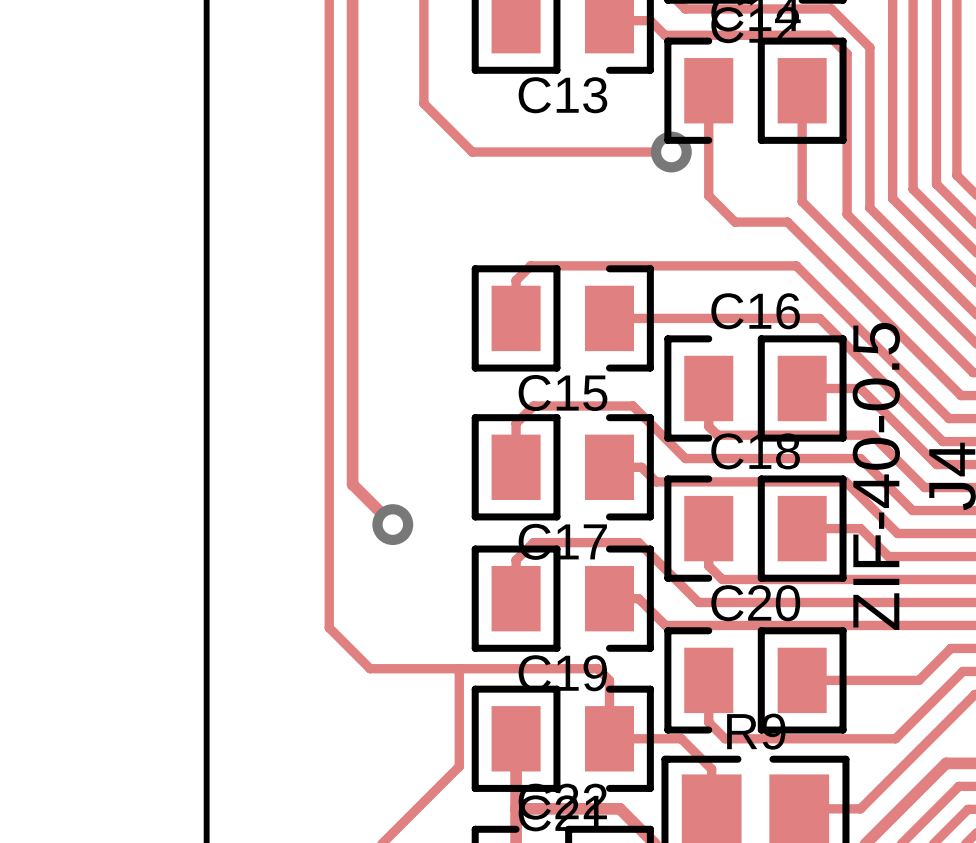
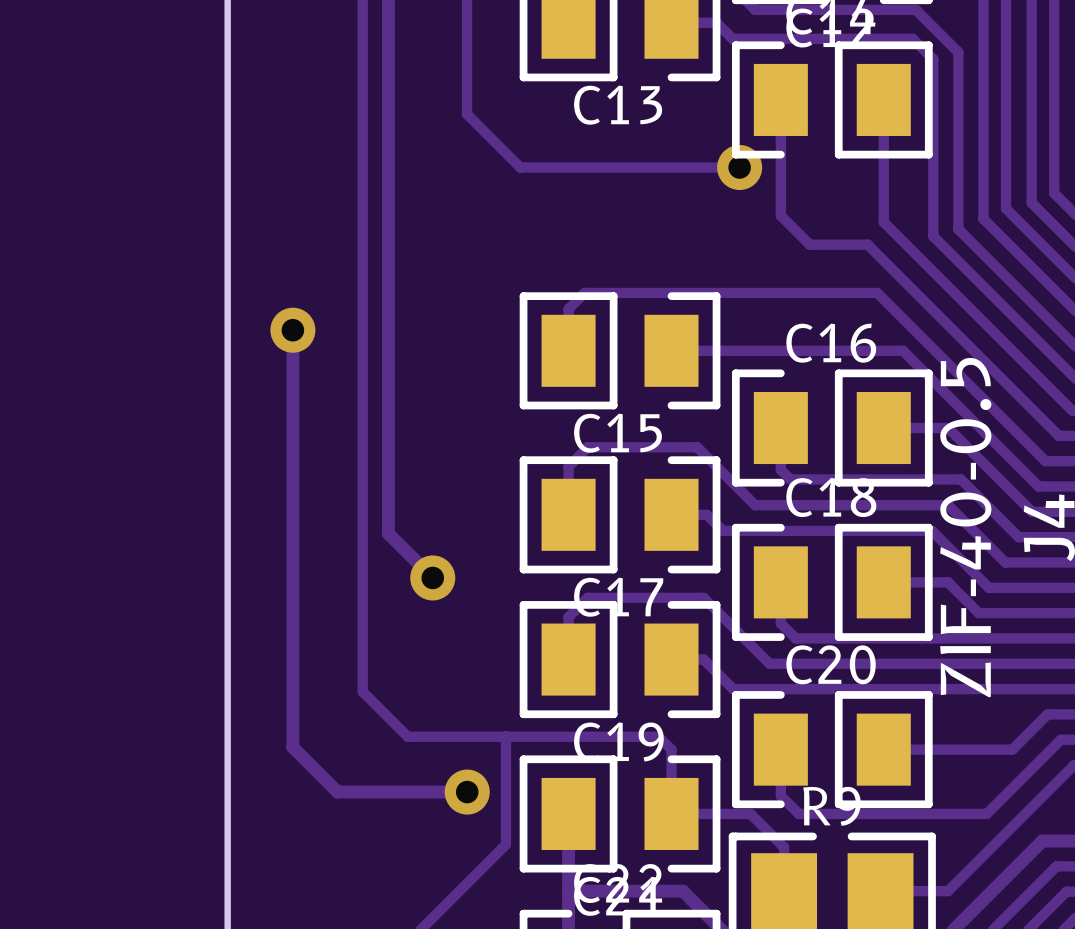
track: none -> (292, 330) (292, 747) (337, 792) (467, 792)
via: none -> (292, 330)
via: none -> (467, 792)

